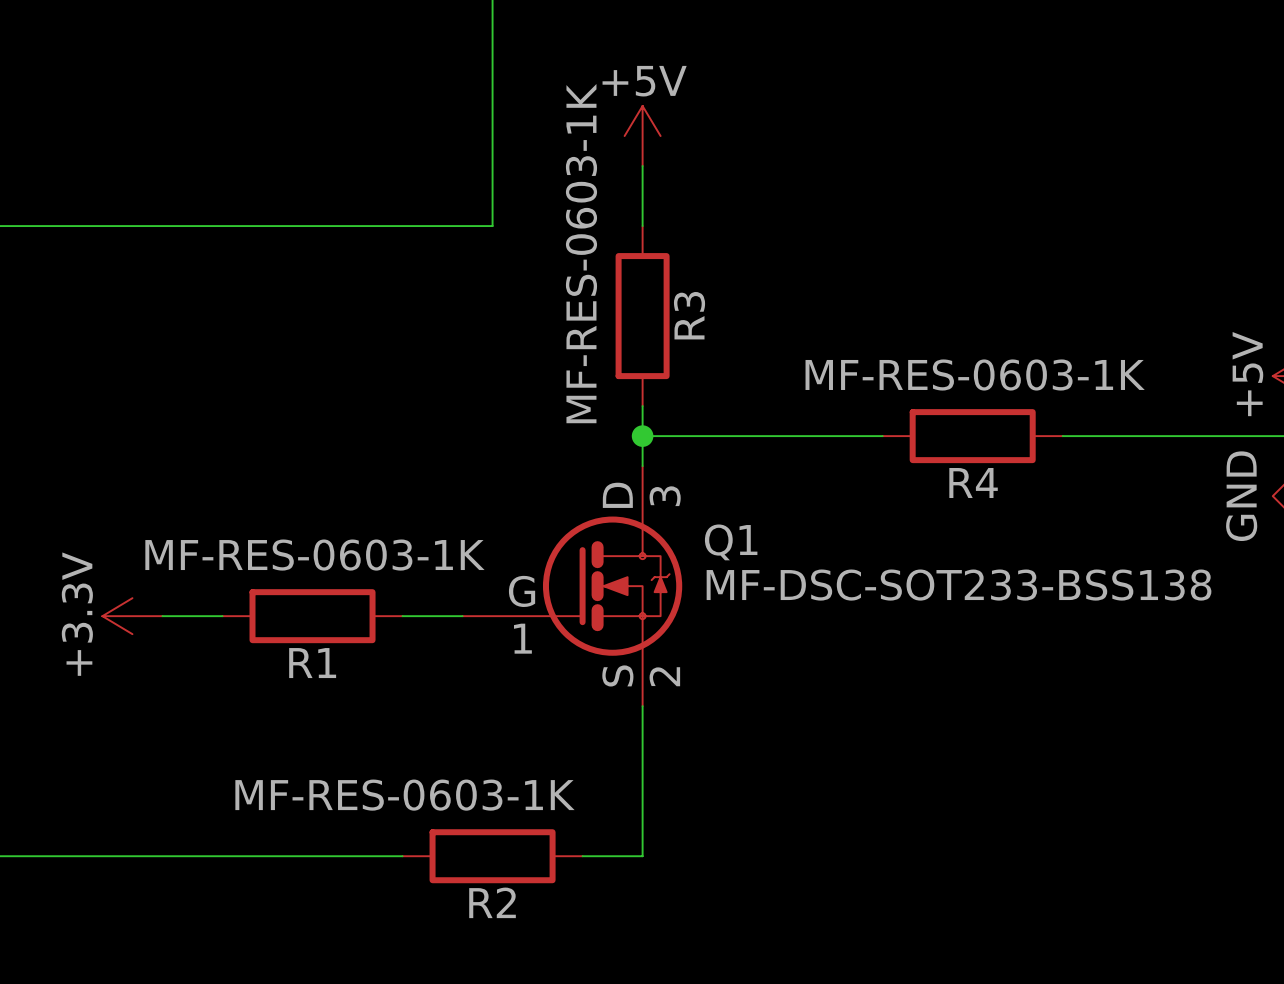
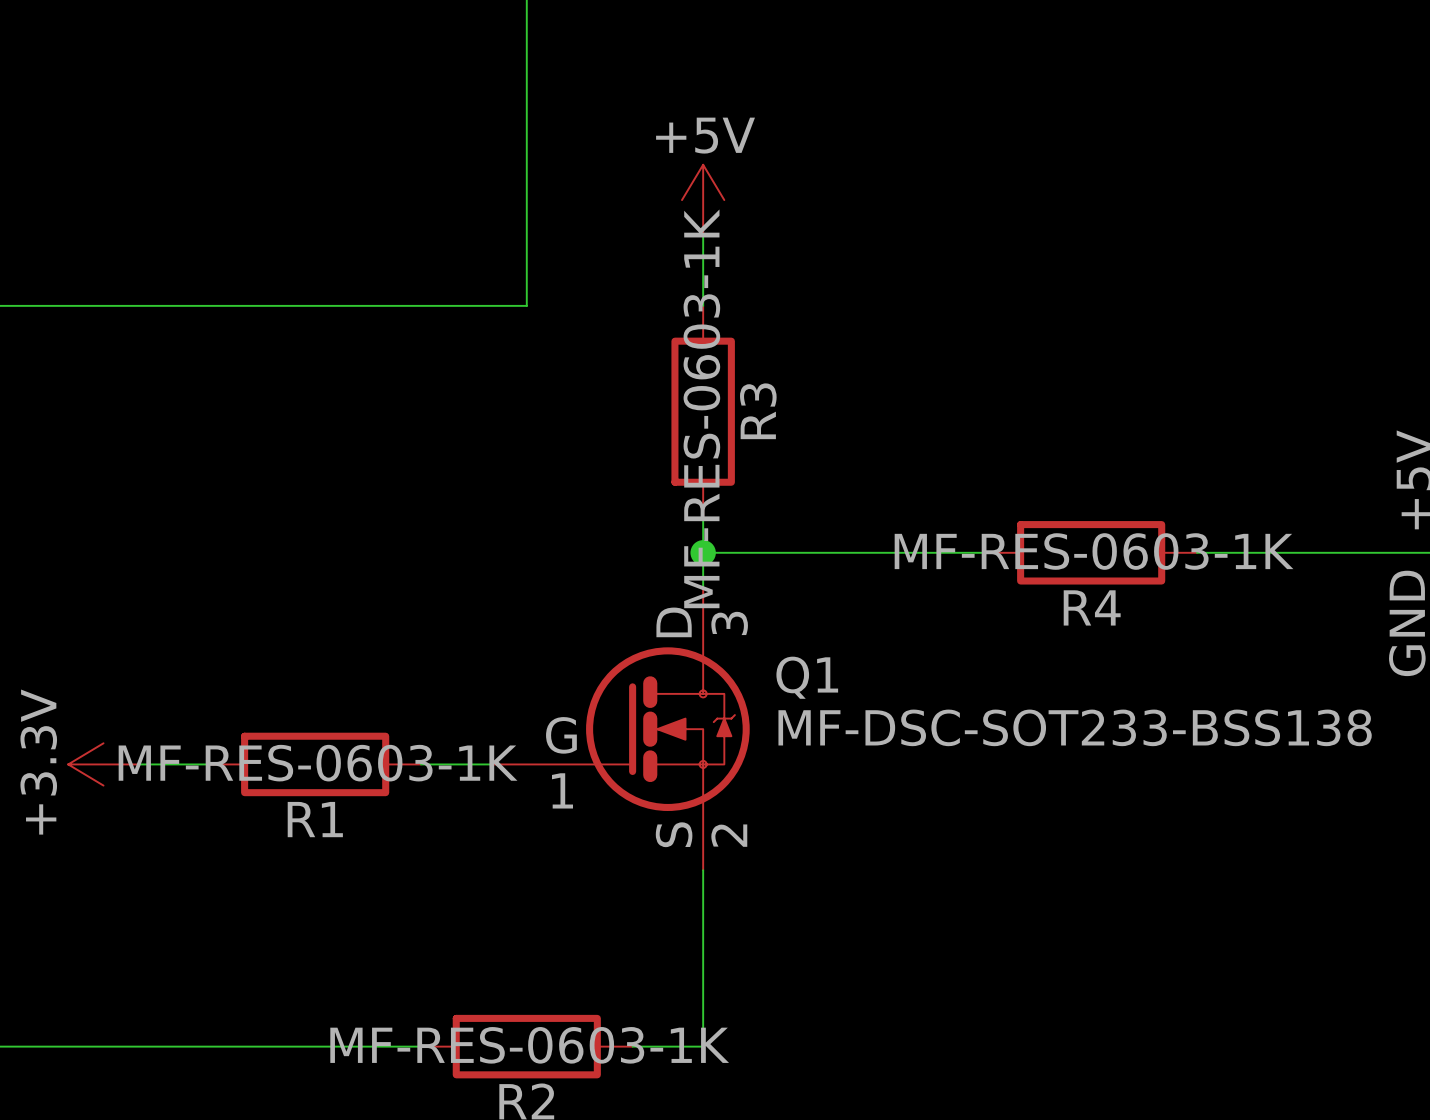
R3 value position: MF-RES-0603-1K (581, 253) -> MF-RES-0603-1K (701, 408)
R4 value position: MF-RES-0603-1K (975, 375) -> MF-RES-0603-1K (1094, 551)
R1 value position: MF-RES-0603-1K (314, 555) -> MF-RES-0603-1K (318, 763)
R2 value position: MF-RES-0603-1K (404, 795) -> MF-RES-0603-1K (529, 1045)

